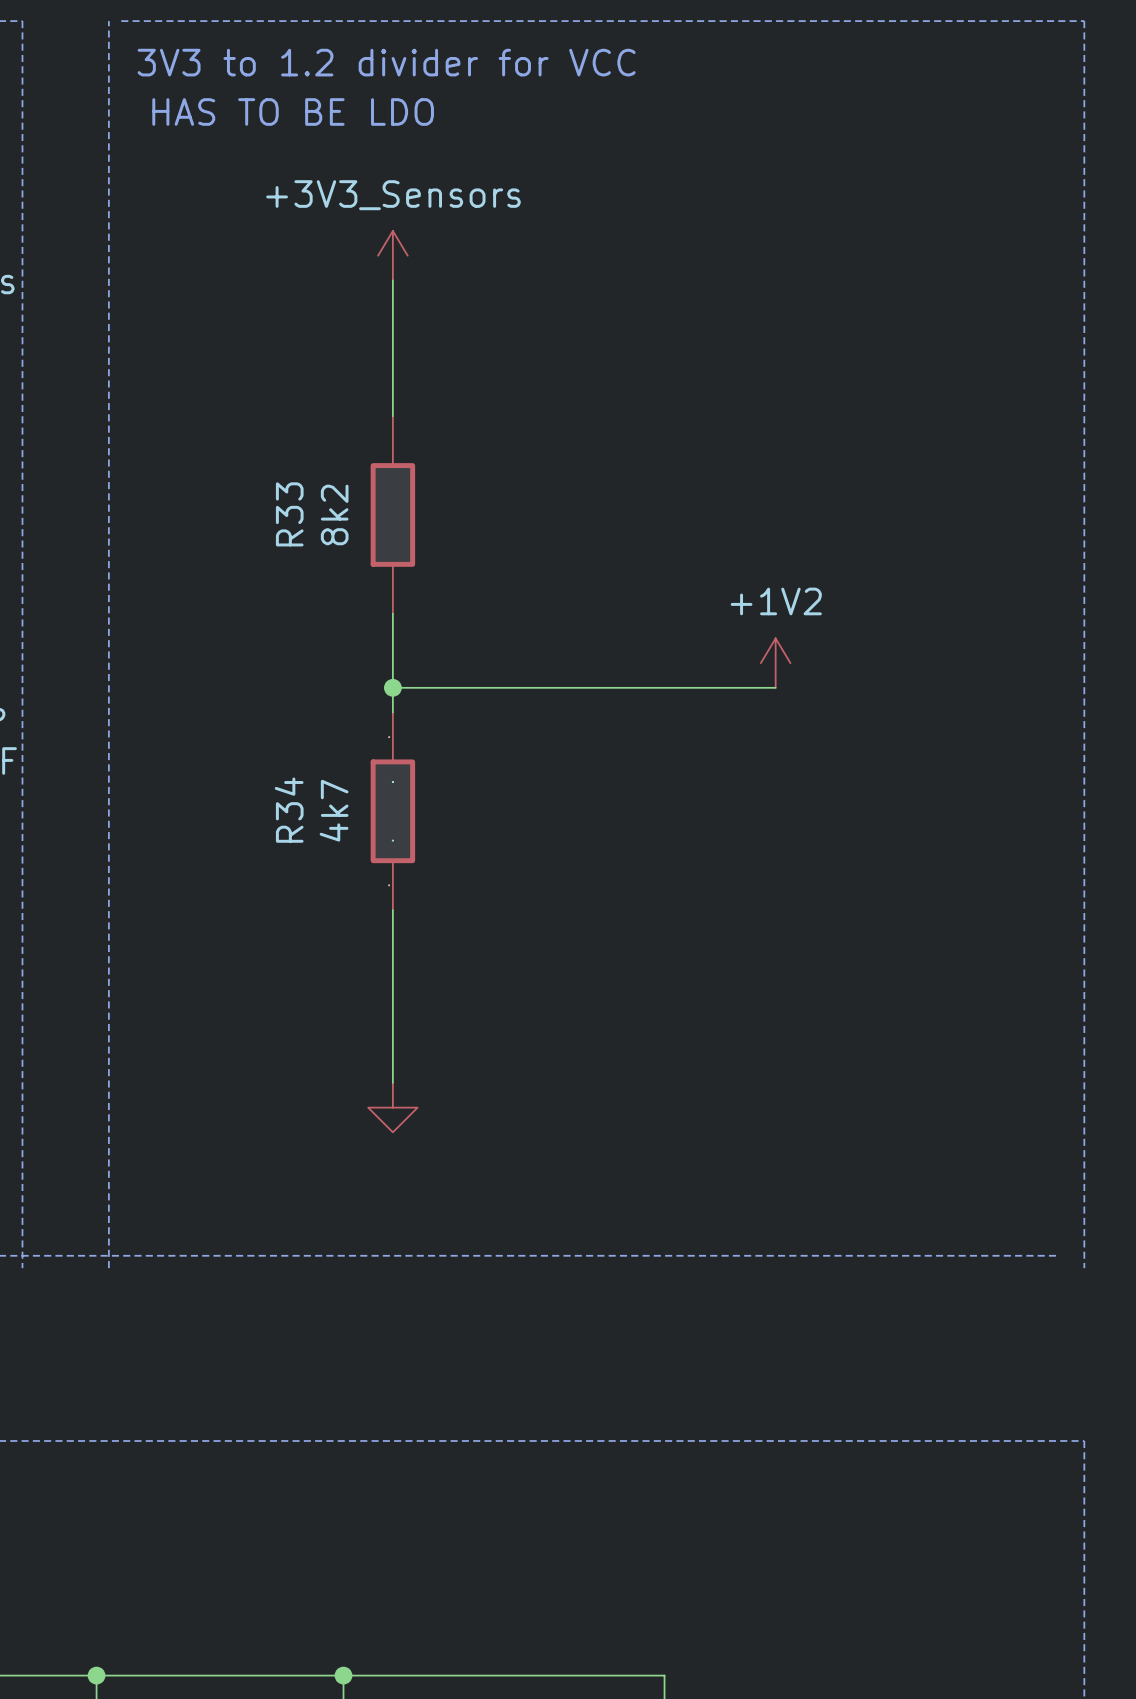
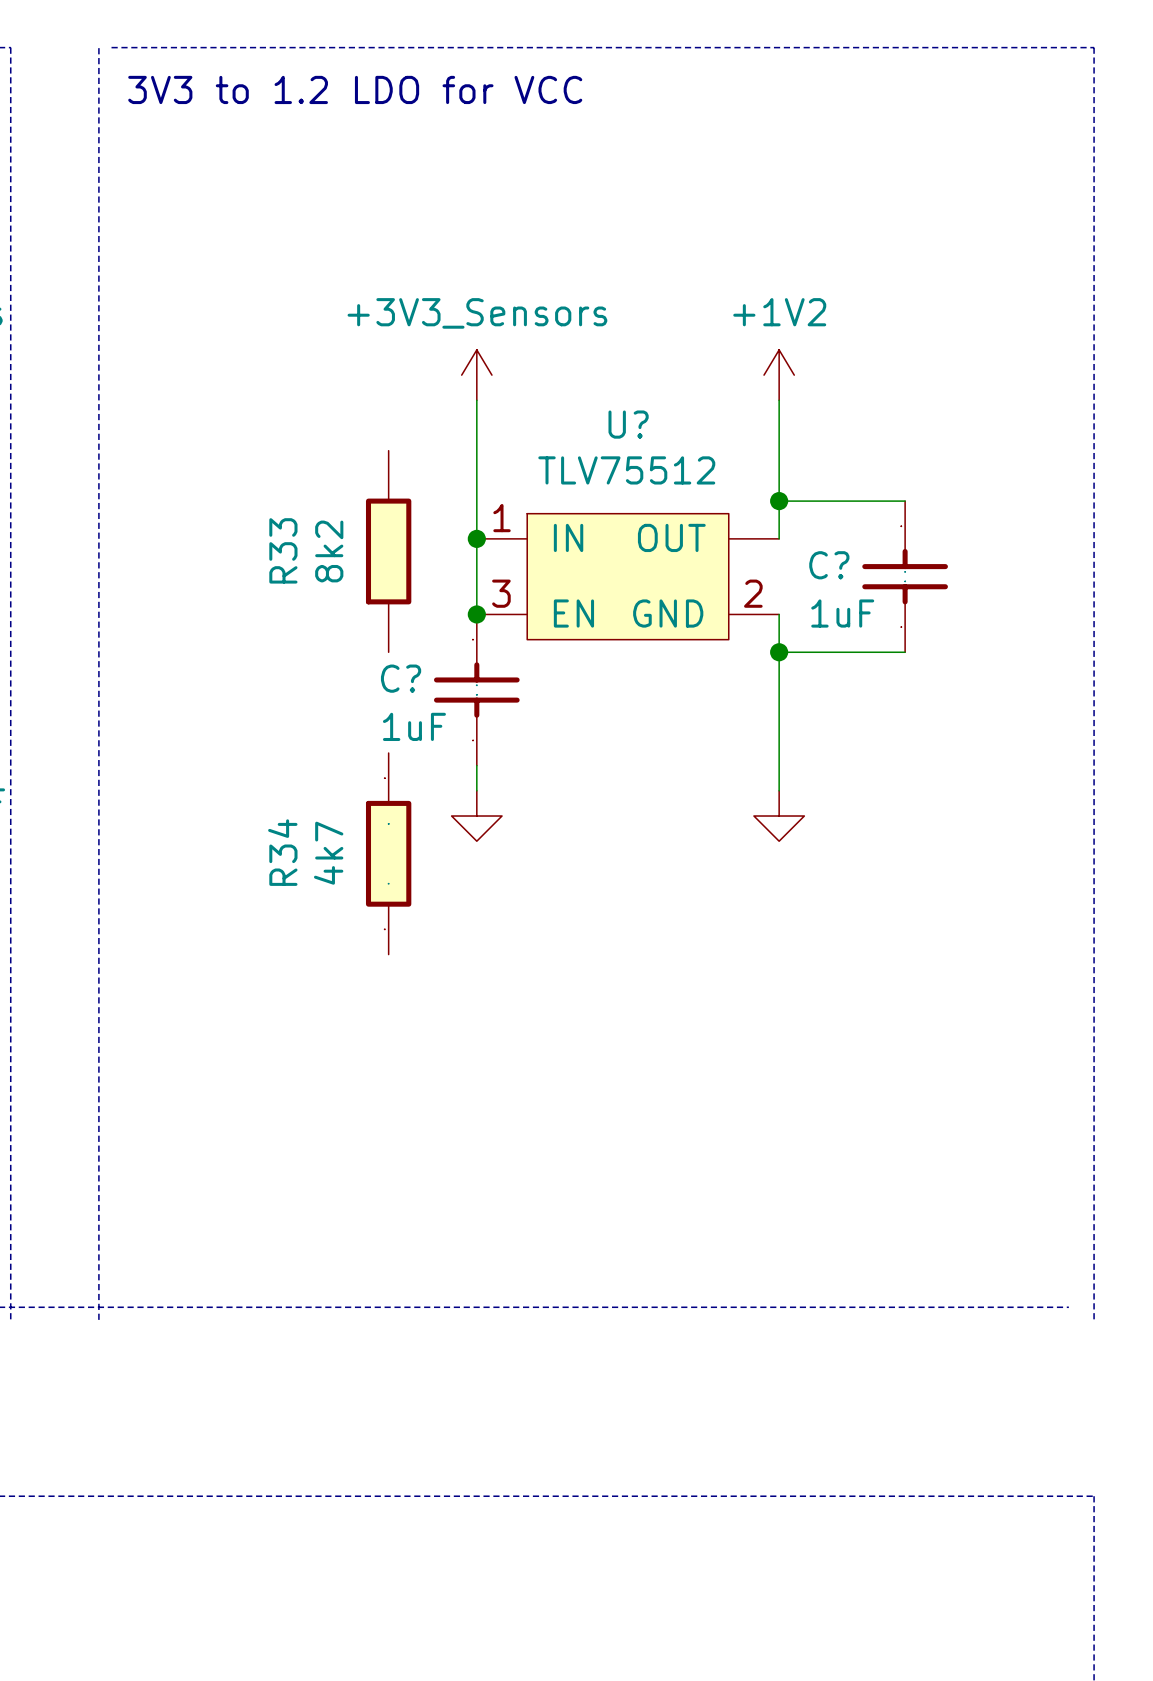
text: 3V3 to 1.2 divider for VCC (386, 62) -> 3V3 to 1.2 LDO for VCC (355, 89)
text: HAS TO BE LDO (293, 111) -> none
power symbol position: +3V3_Sensors (392, 255) -> +3V3_Sensors (476, 375)
wire: (392, 280) (392, 416) -> (779, 400) (779, 538)
wire: none -> (476, 400) (476, 614)
wire: none -> (779, 501) (905, 501)
junction: none -> (779, 501)
junction: none -> (476, 538)
U?: none -> TLV75512 (627, 576)
C?: none -> (905, 576)
junction: none -> (476, 614)
wire: none -> (779, 614) (779, 790)
wire: (392, 613) (392, 712) -> none
wire: none -> (779, 652) (905, 652)
junction: none -> (779, 652)
C?: none -> (476, 690)
power symbol position: +1V2 (775, 663) -> +1V2 (779, 375)
wire: (392, 687) (775, 687) -> none
junction: (392, 687) -> none
wire: none -> (476, 765) (476, 790)
power symbol: none -> (476, 816)
power symbol: none -> (779, 816)
wire: (392, 910) (392, 1082) -> none
power symbol: (392, 1107) -> none

